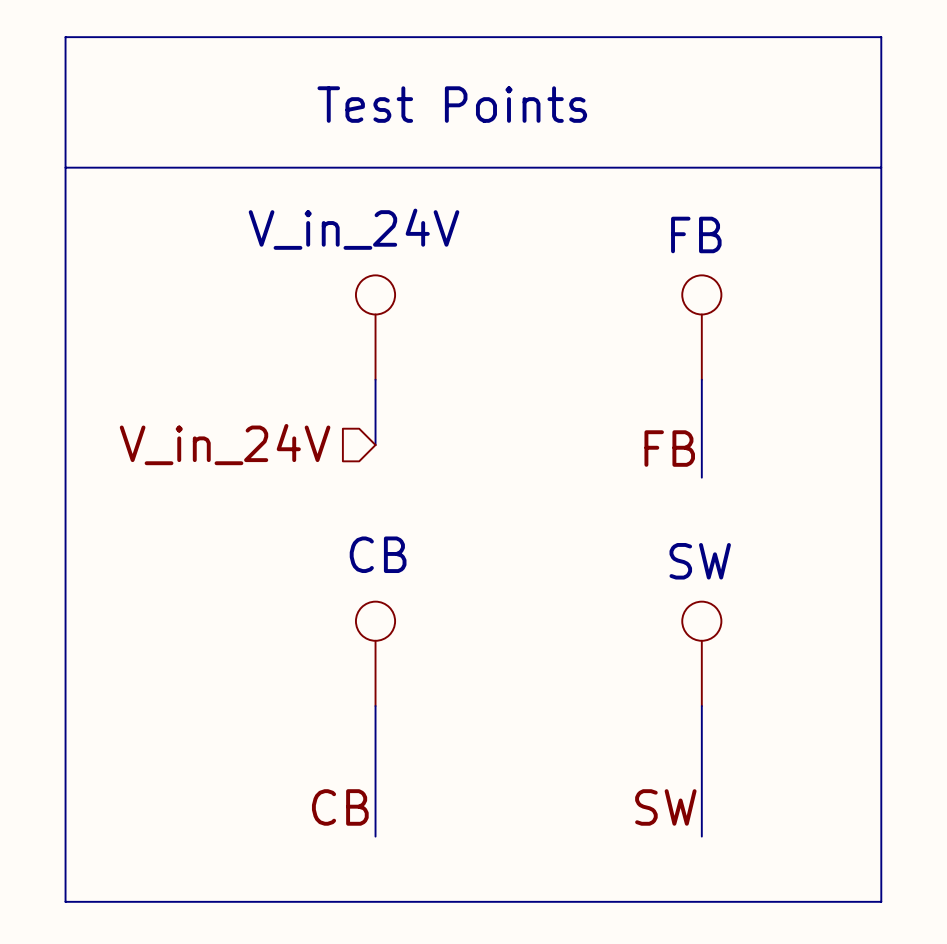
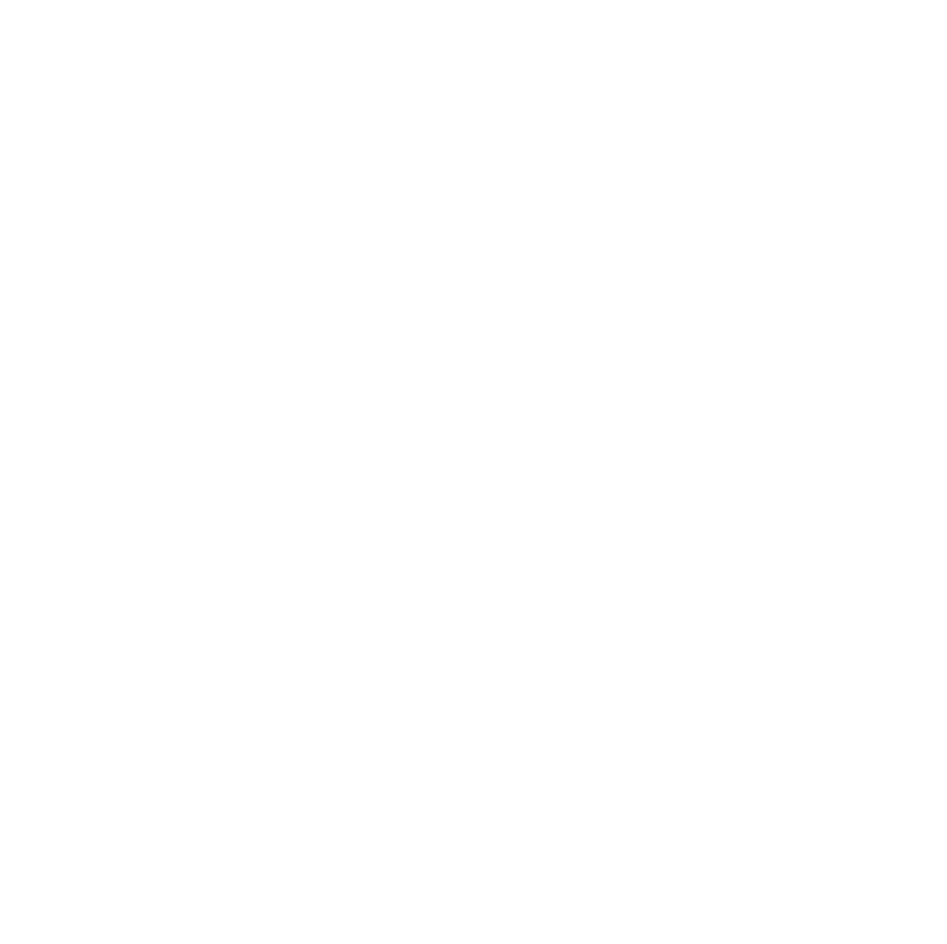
line: (65, 37) (881, 37) (881, 901) (65, 901) (65, 37) -> none
text: Test Points (452, 104) -> none
line: (65, 167) (881, 167) -> none
part: V_in_24V (375, 327) -> none
part: FB (701, 327) -> none
wire: (375, 379) (375, 445) -> none
wire: (701, 379) (701, 477) -> none
hierarchical label: V_in_24V (225, 444) -> none
label: FB (669, 448) -> none
part: CB (375, 653) -> none
part: SW (701, 653) -> none
wire: (375, 706) (375, 836) -> none
wire: (701, 706) (701, 836) -> none
label: CB (340, 807) -> none
label: SW (665, 807) -> none

